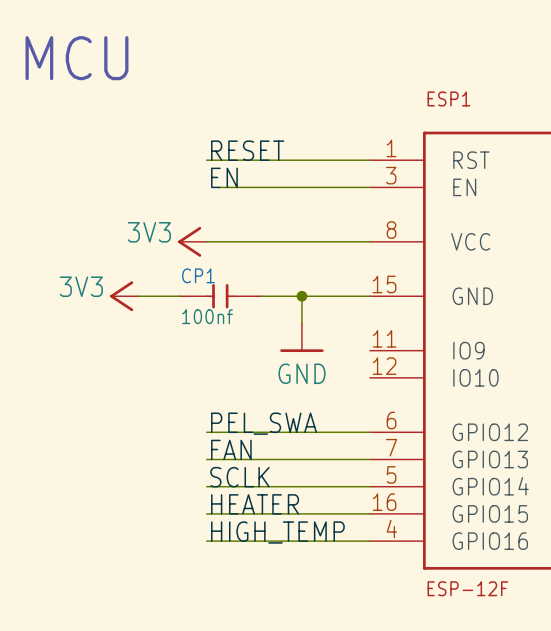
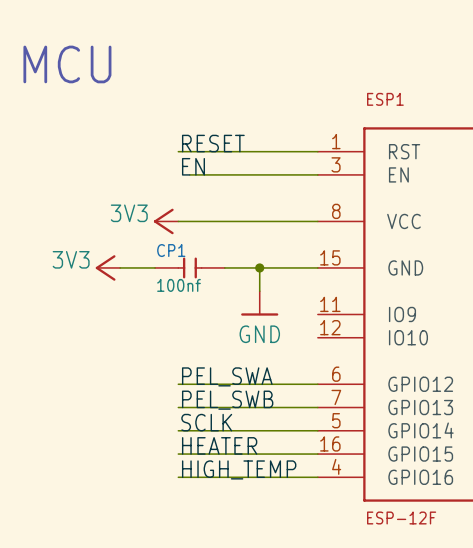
label: FAN (231, 449) -> PEL_SWB (227, 400)

